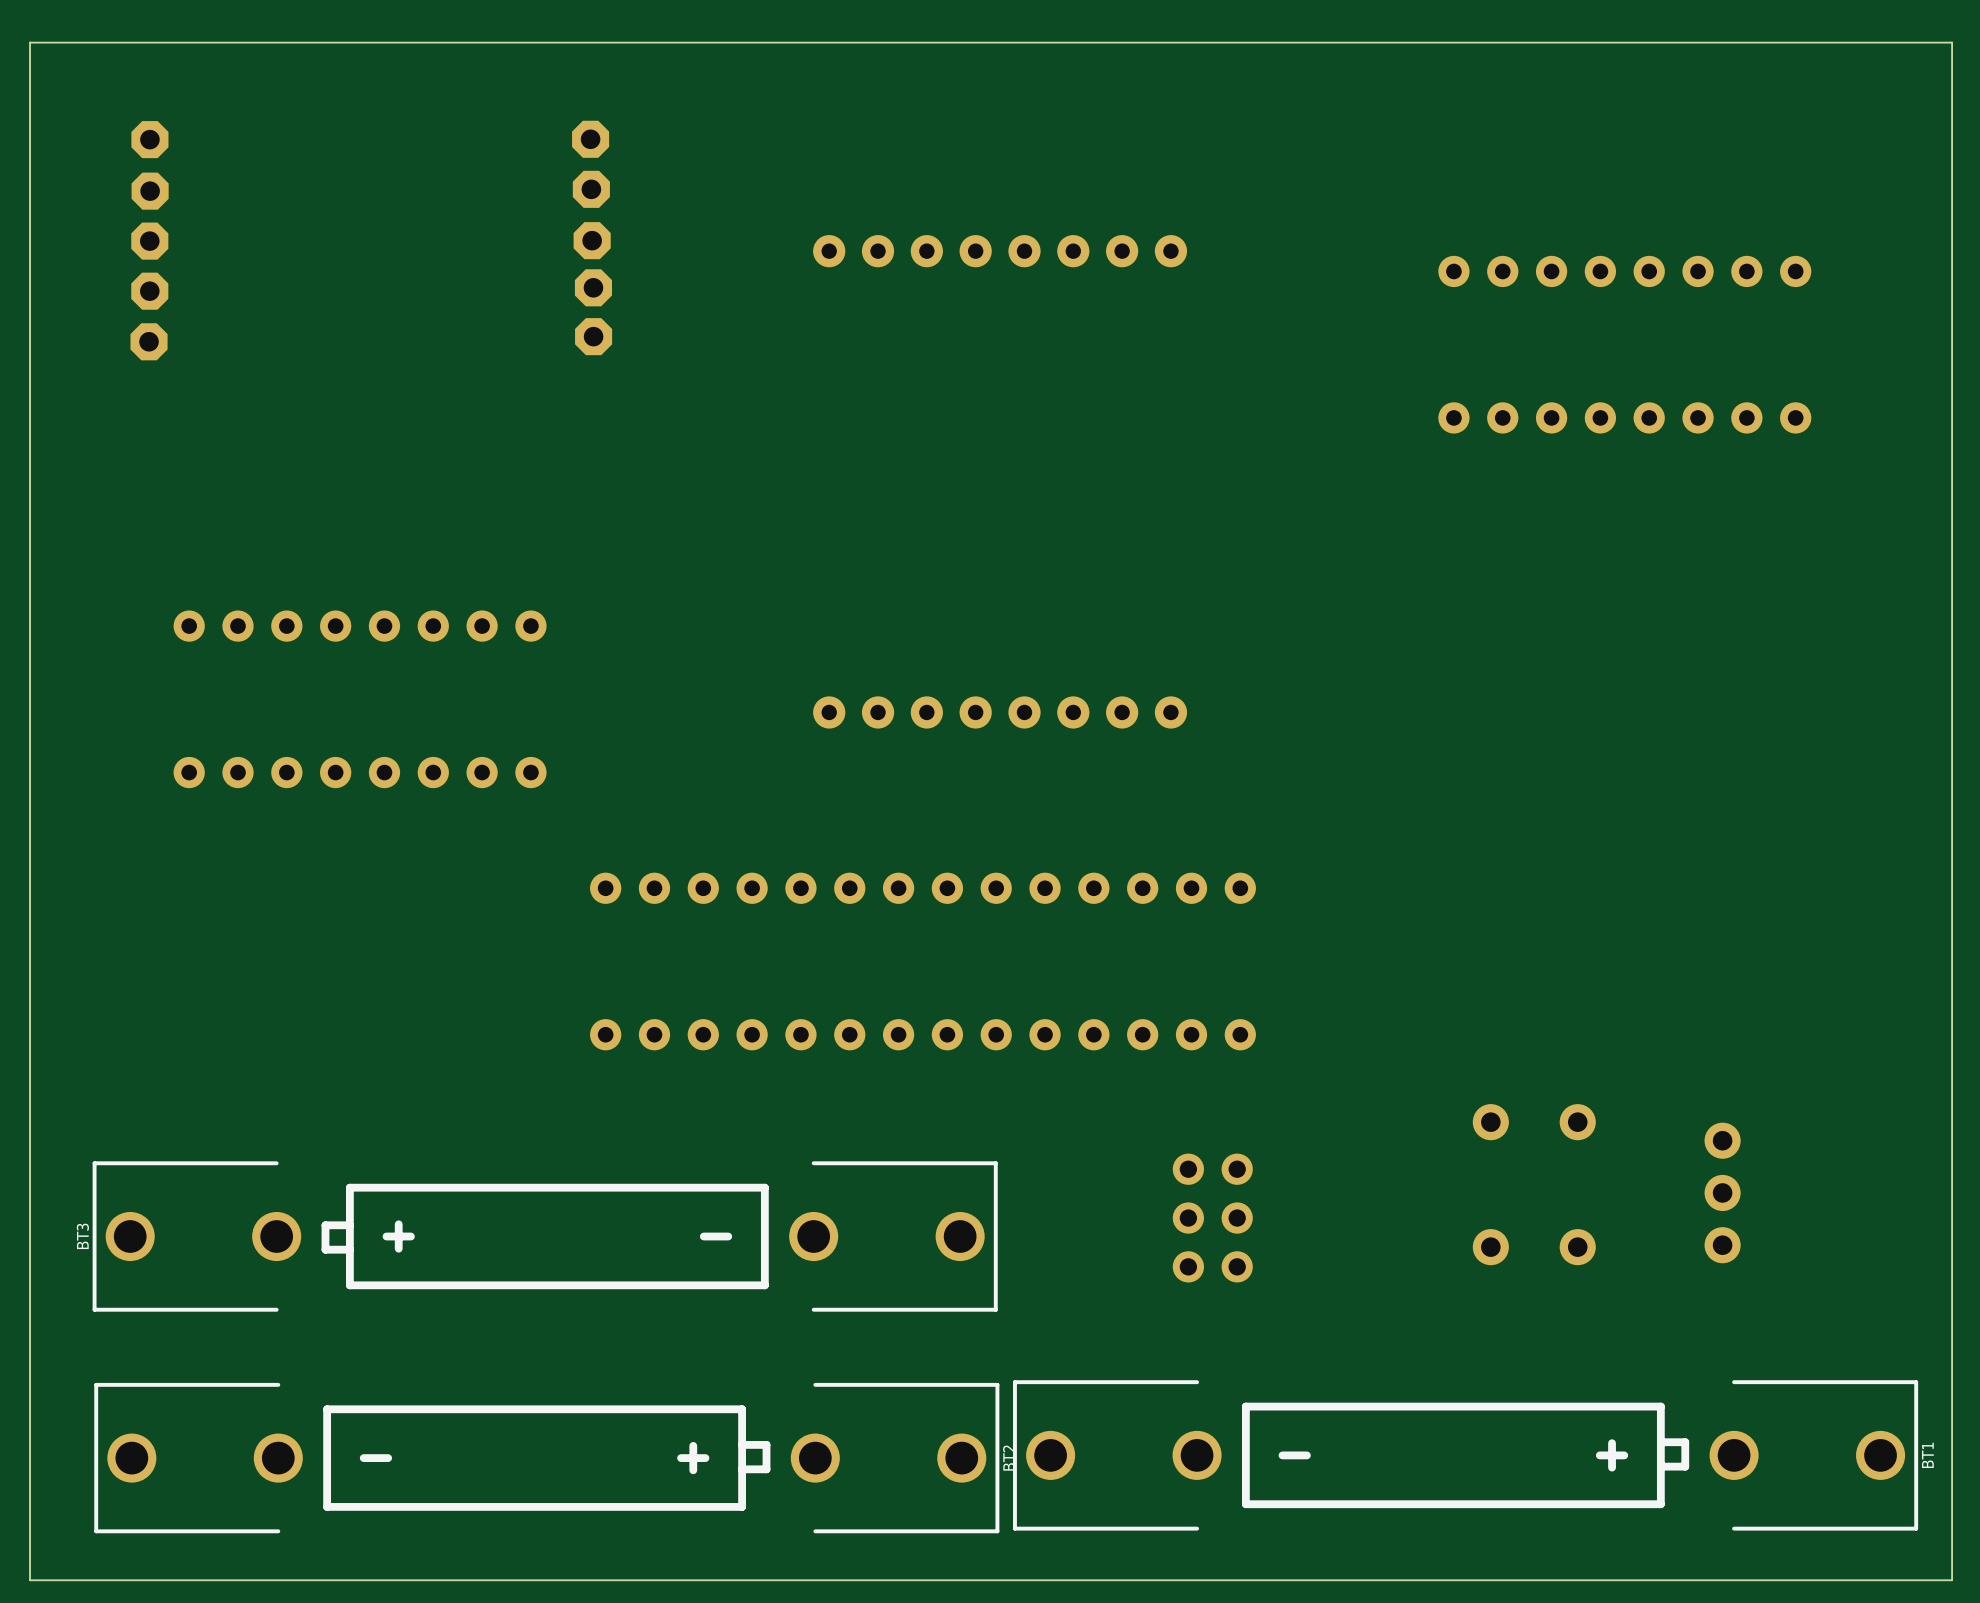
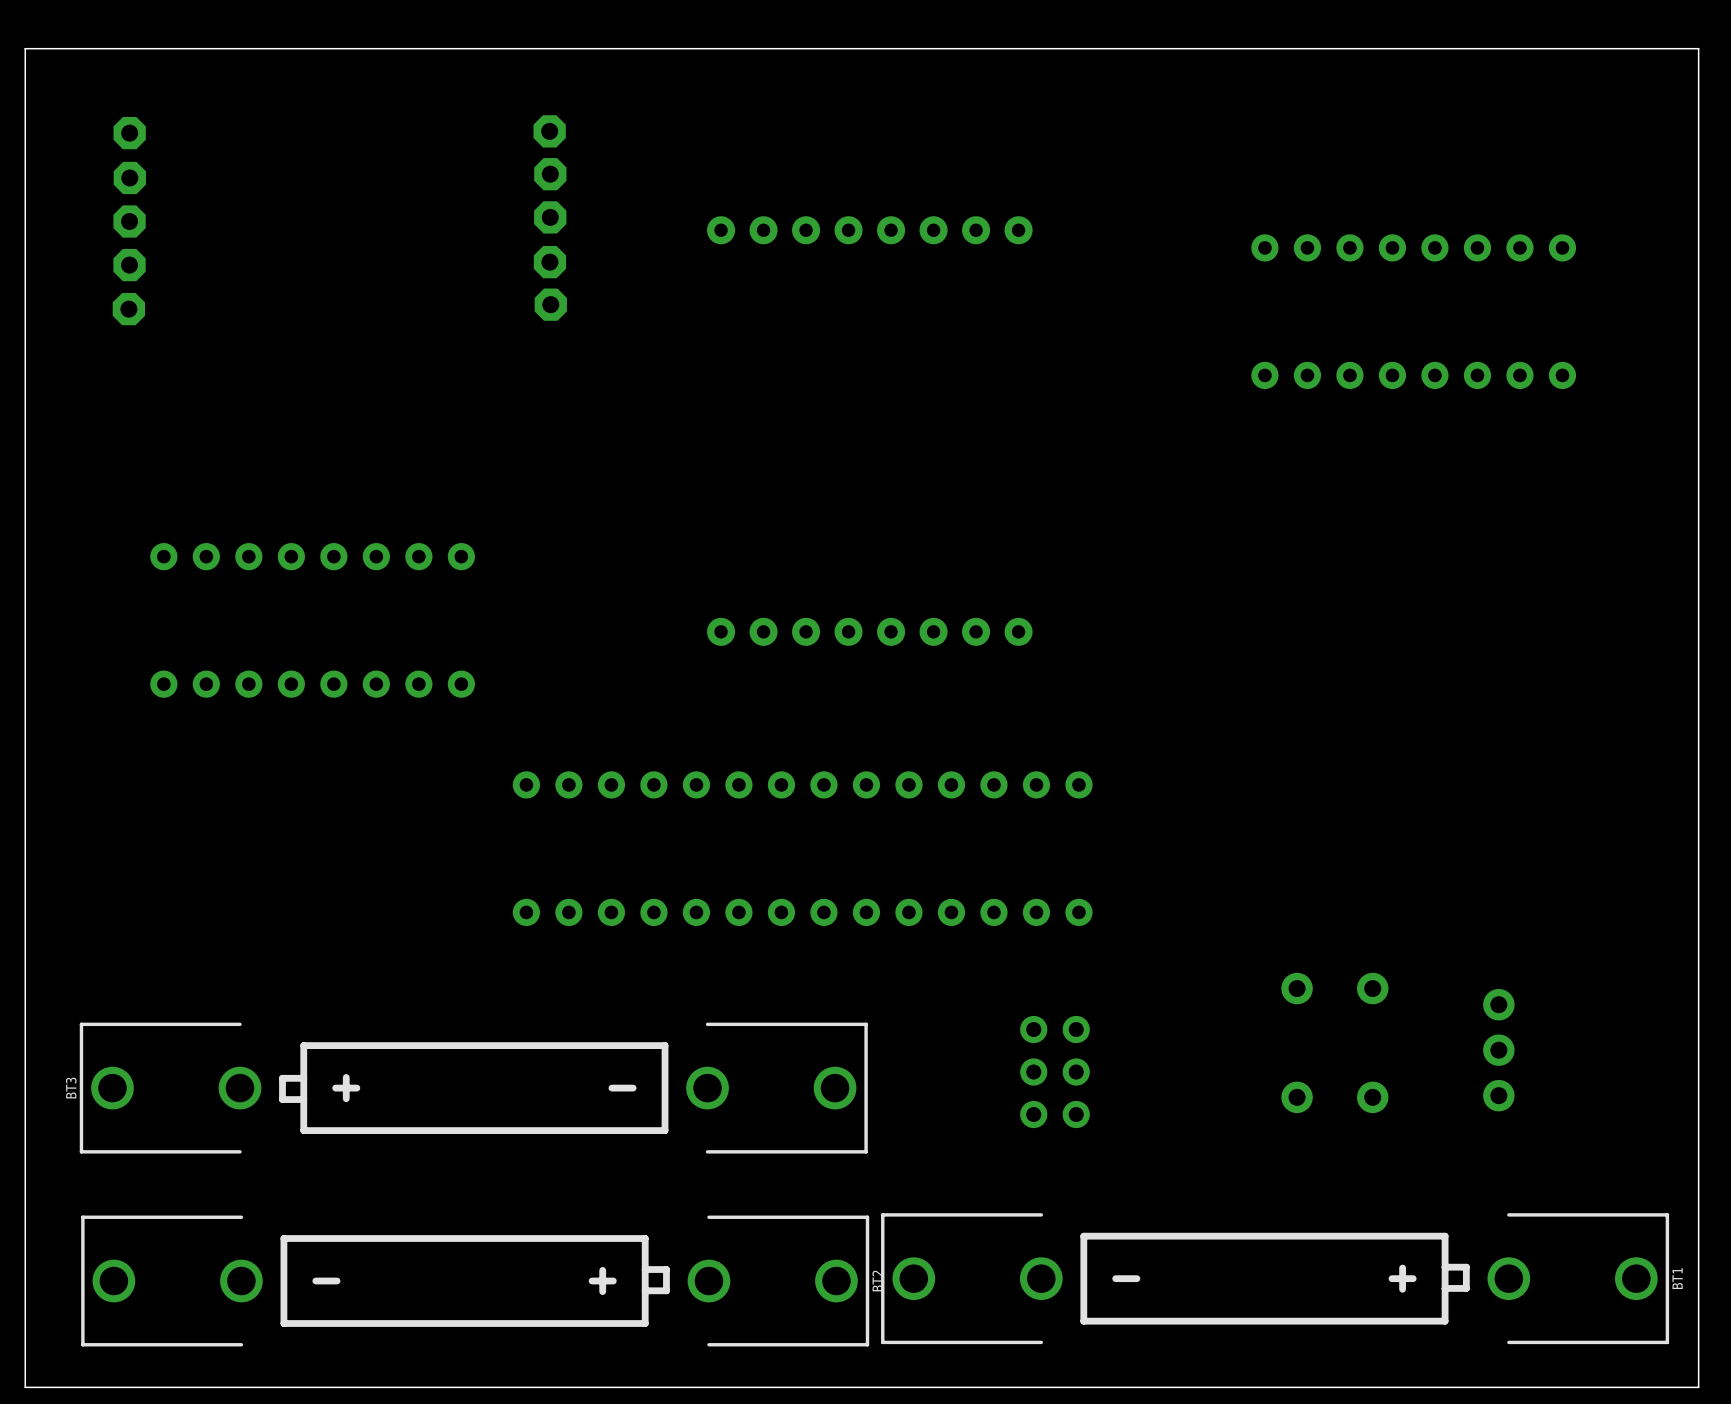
part: none -> (549, 131)
part: (590, 139) -> none
part: none -> (550, 174)
part: (591, 189) -> none
part: none -> (550, 217)
part: (592, 240) -> none
part: (593, 287) -> none
part: none -> (549, 262)
part: (593, 336) -> none
part: none -> (550, 304)

